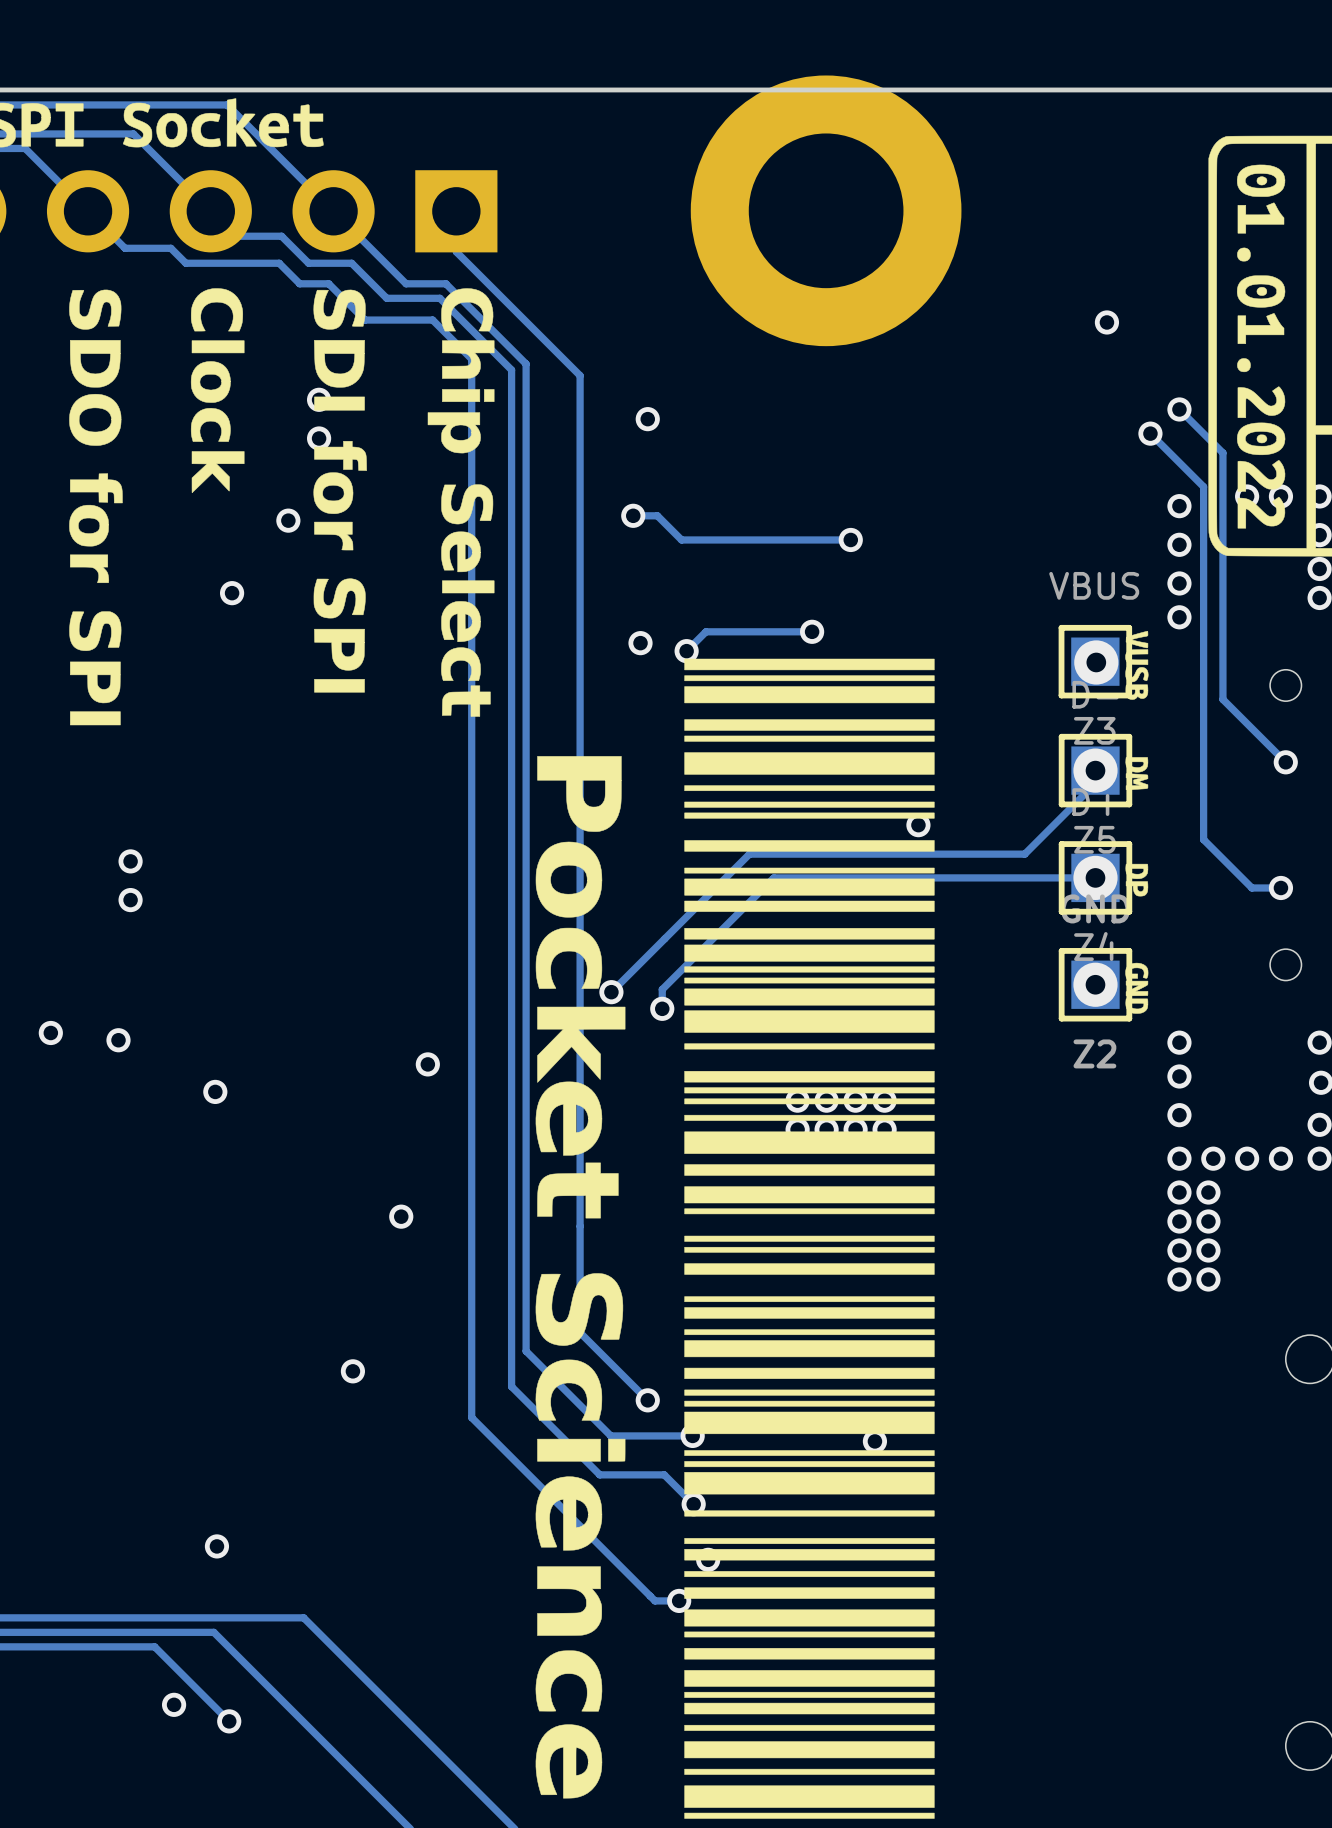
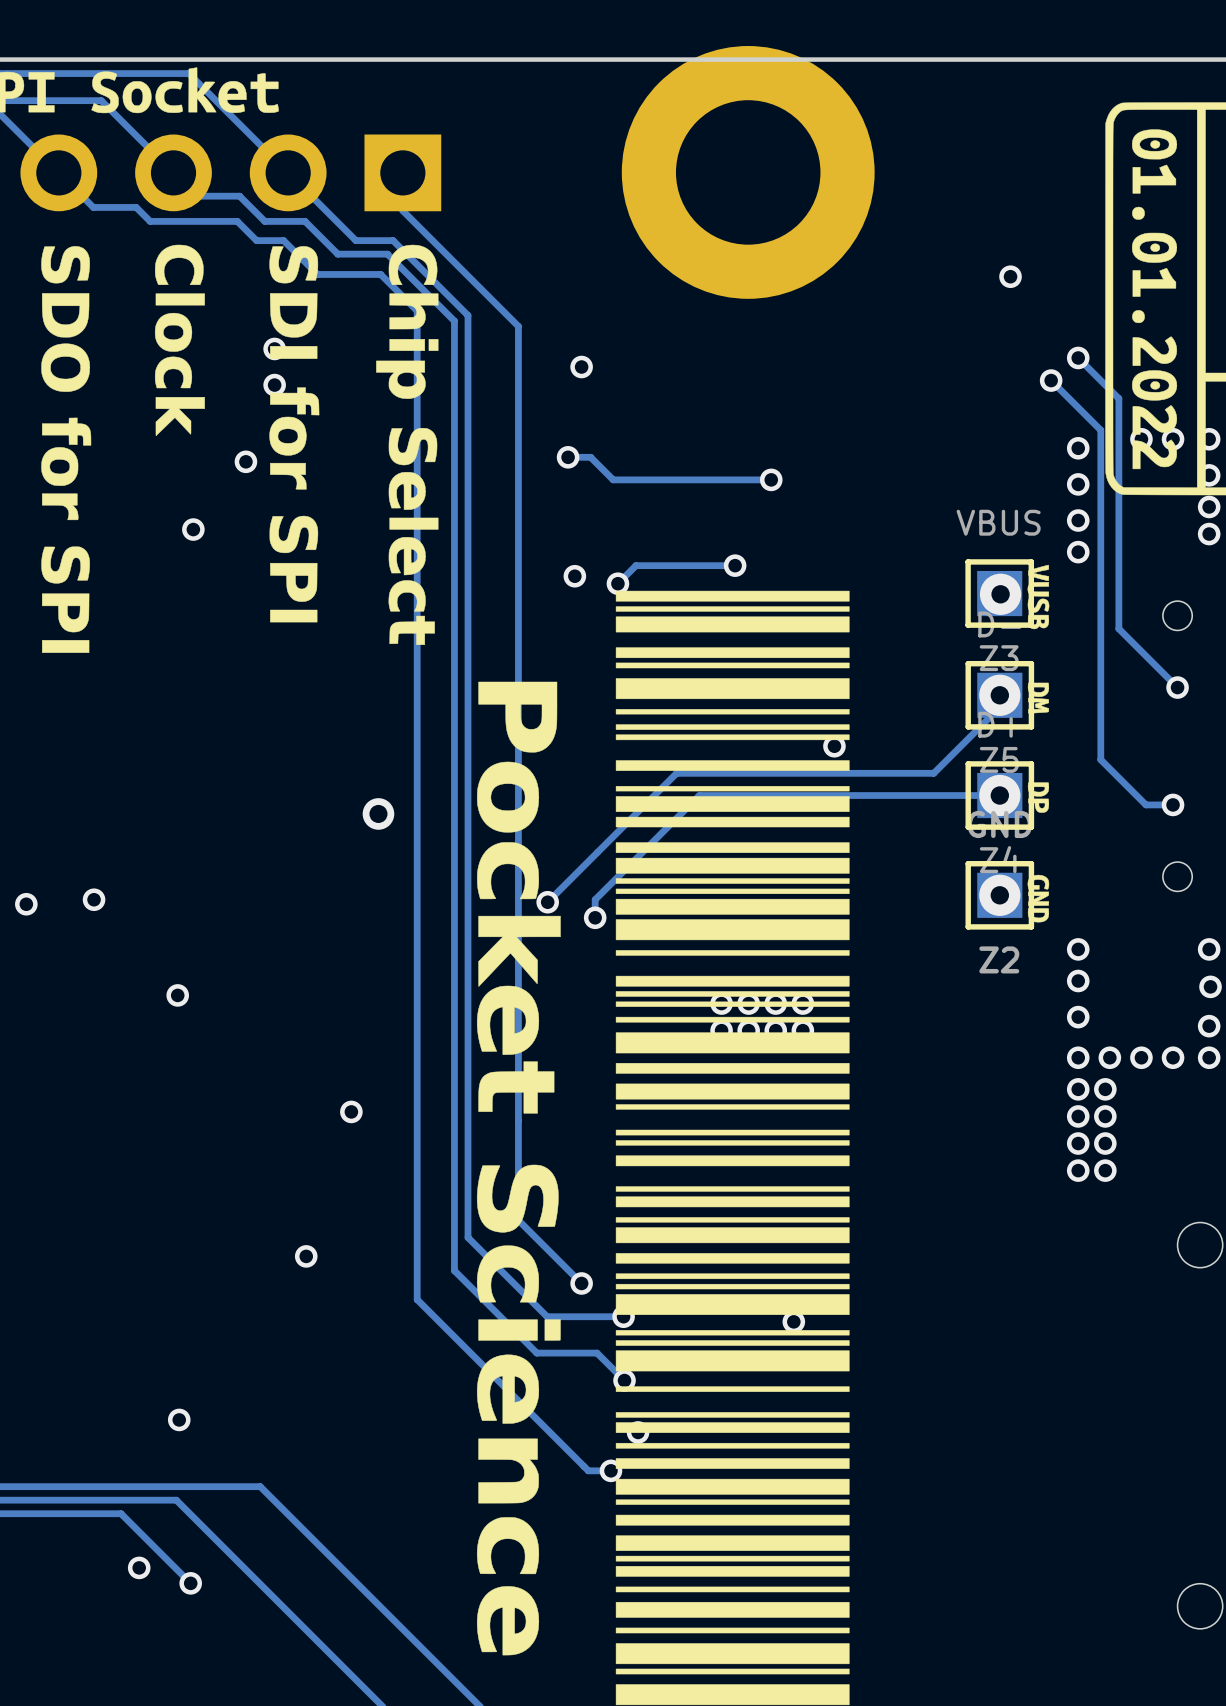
via: (130, 861) -> none
via: none -> (378, 813)
via: (130, 900) -> none
via: none -> (94, 899)
via position: (50, 1032) -> (26, 904)
via: (118, 1040) -> none
via: (427, 1064) -> none

